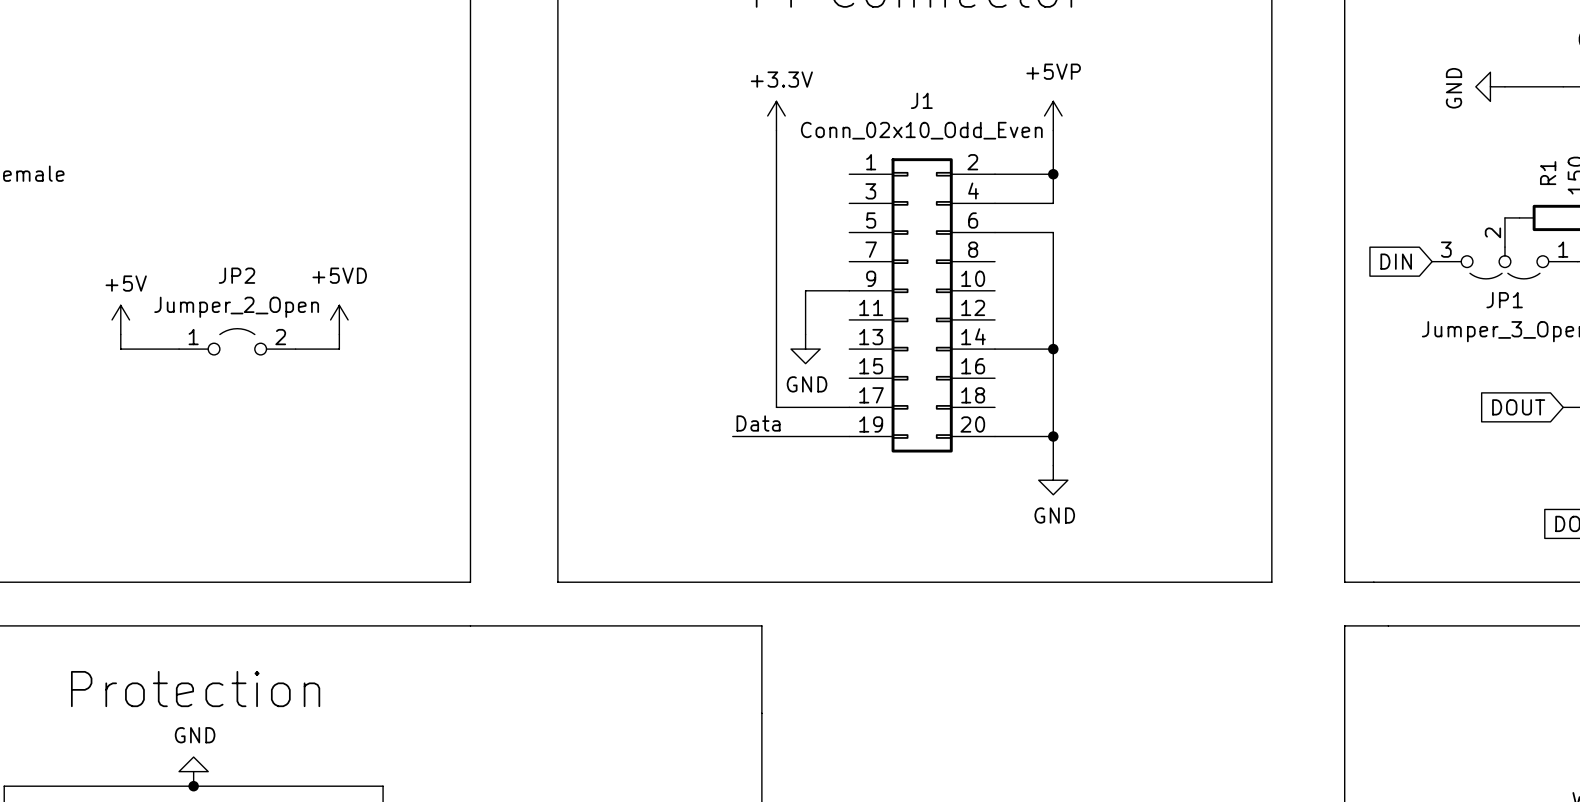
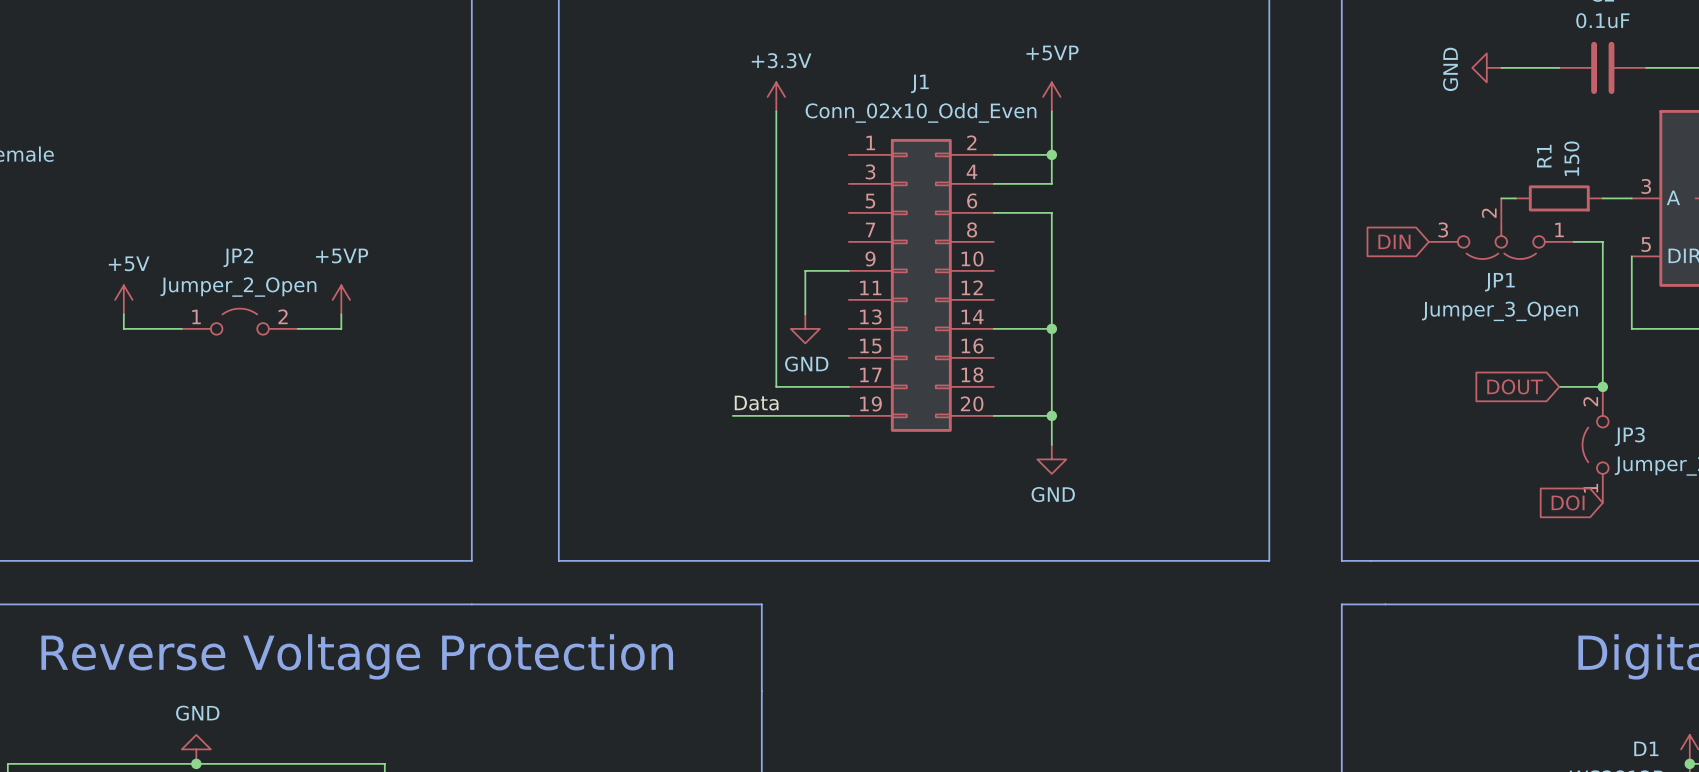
power symbol: +5VD (339, 319) -> +5VP (341, 299)
text: none -> Reverse Voltage Protection (357, 656)
text: Protection (195, 689) -> none

